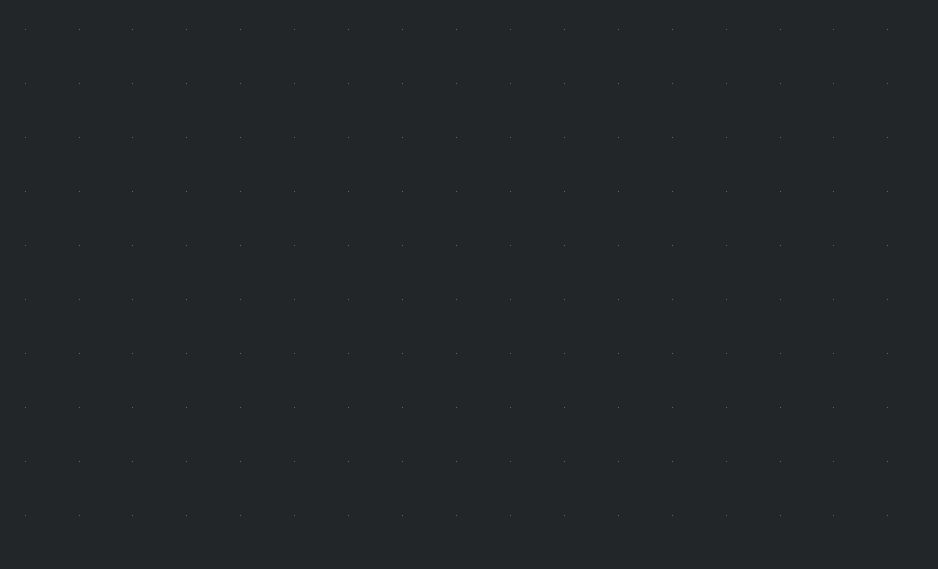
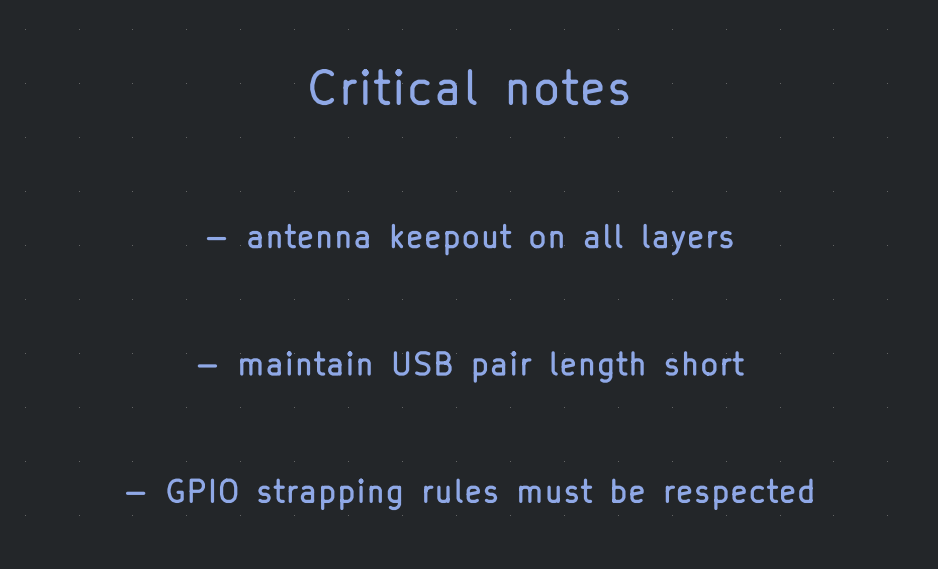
text: none -> Critical notes (469, 87)
text: none -> - antenna keepout on all layers (469, 239)
text: none -> - maintain USB pair length short (470, 366)
text: none -> - GPIO strapping rules must be respected (469, 494)

